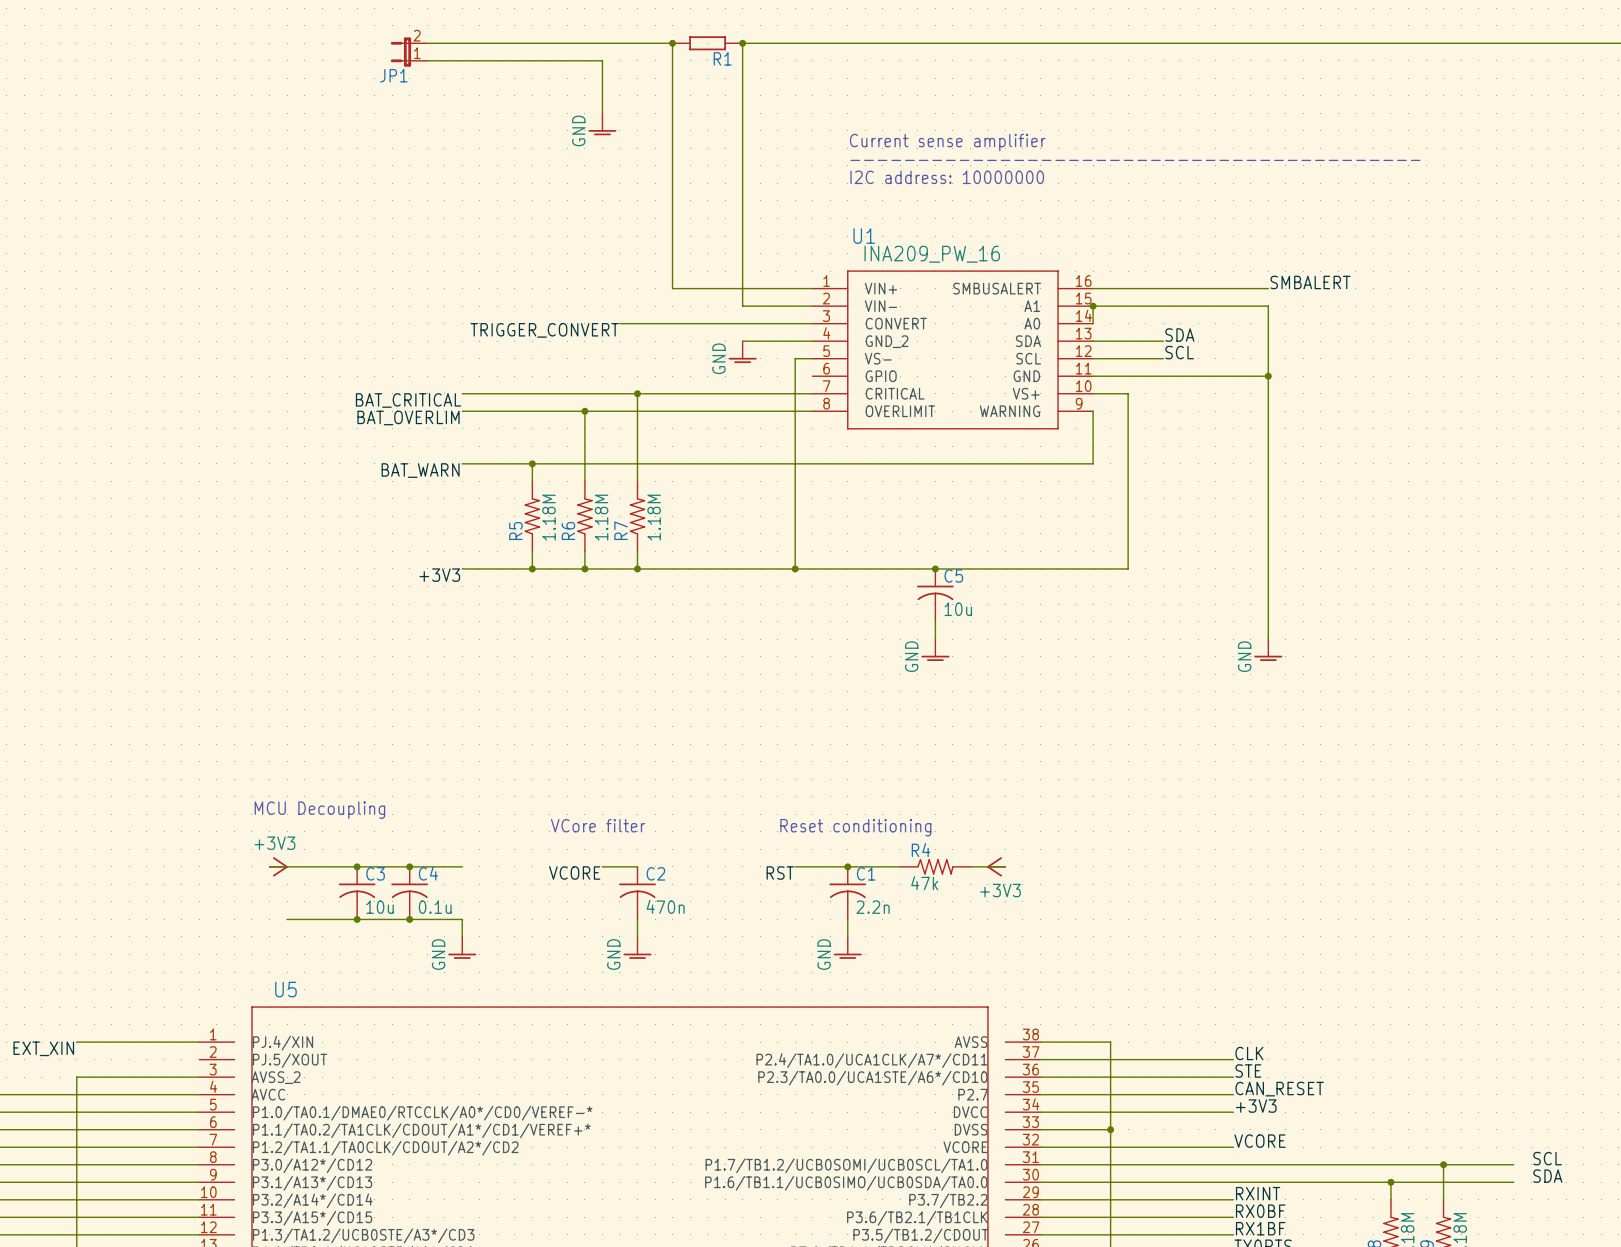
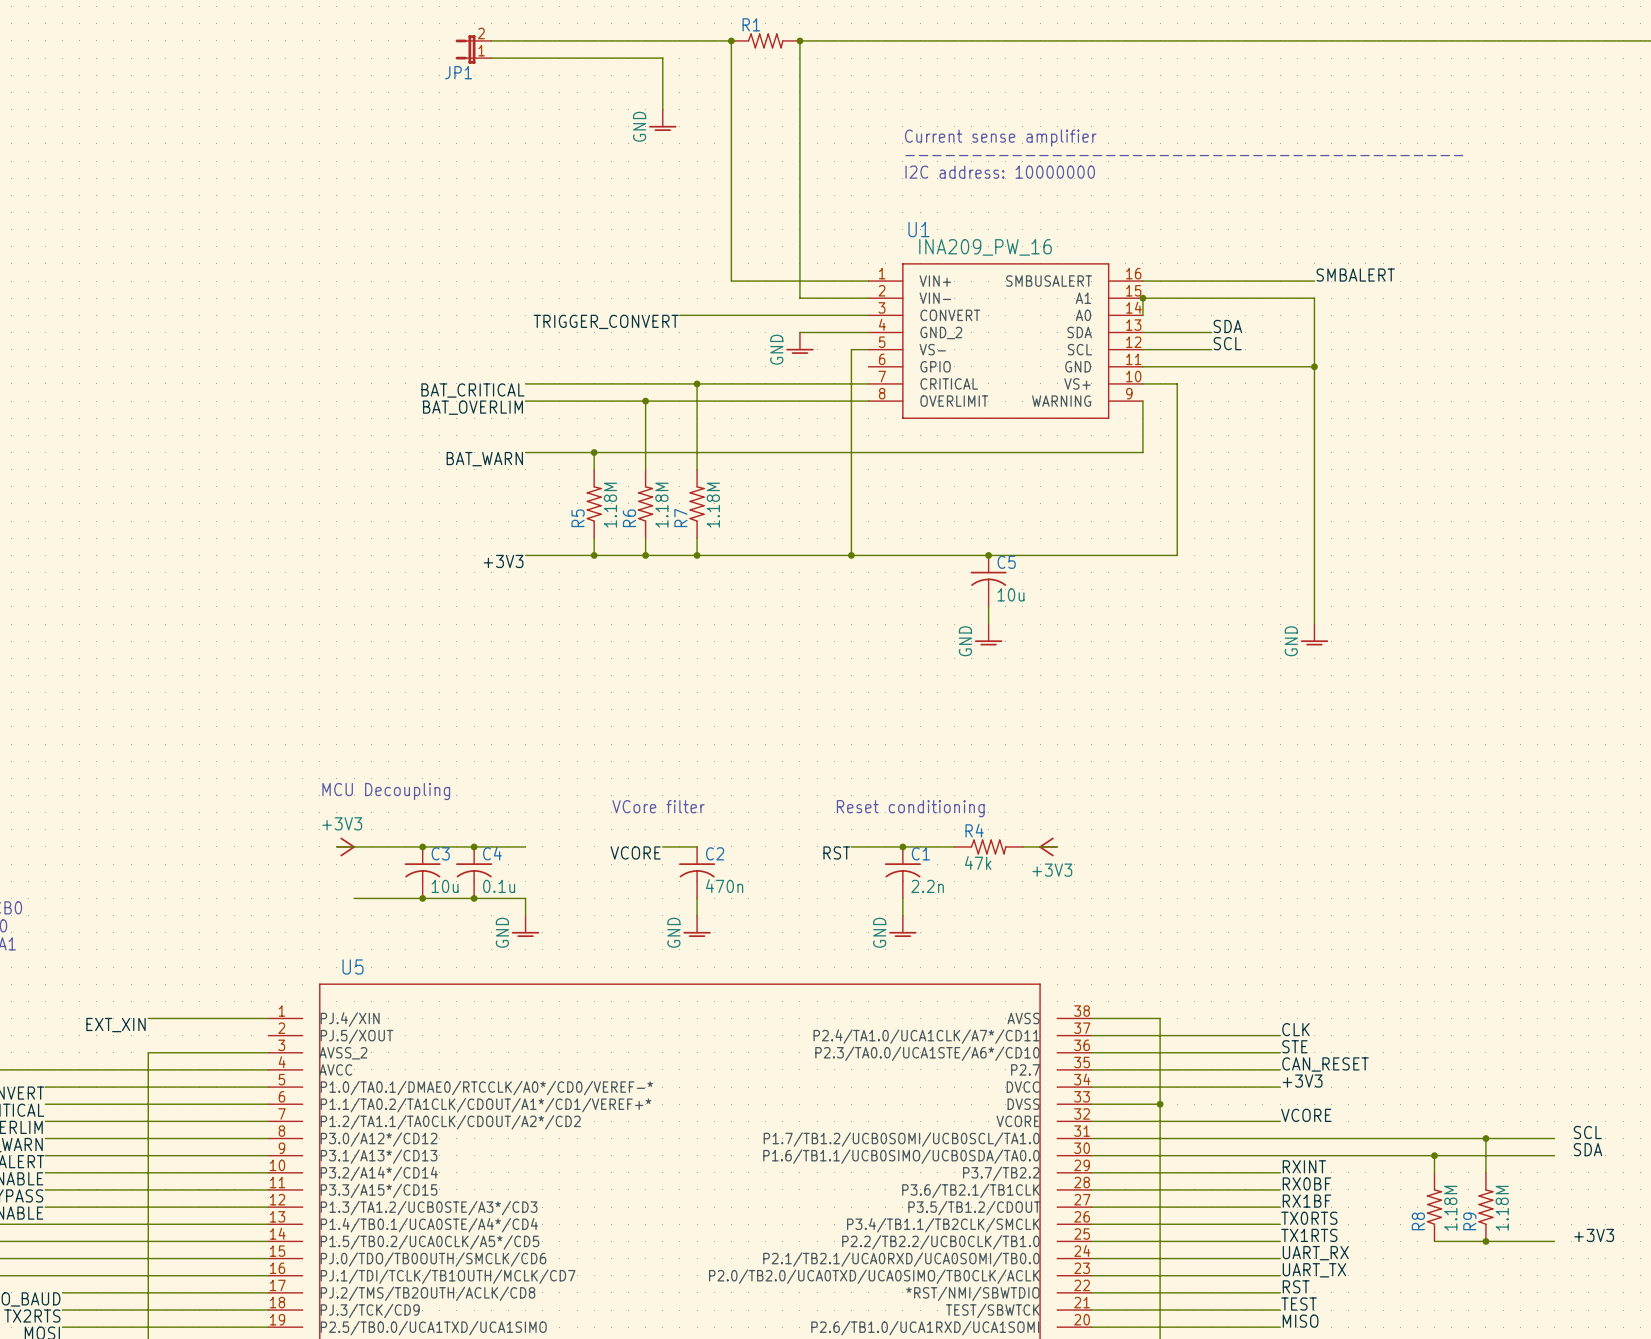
R1 symbol: [672, 36, 743, 51] -> [731, 33, 800, 49]
R1 name position: R1 (722, 58) -> R1 (751, 24)

